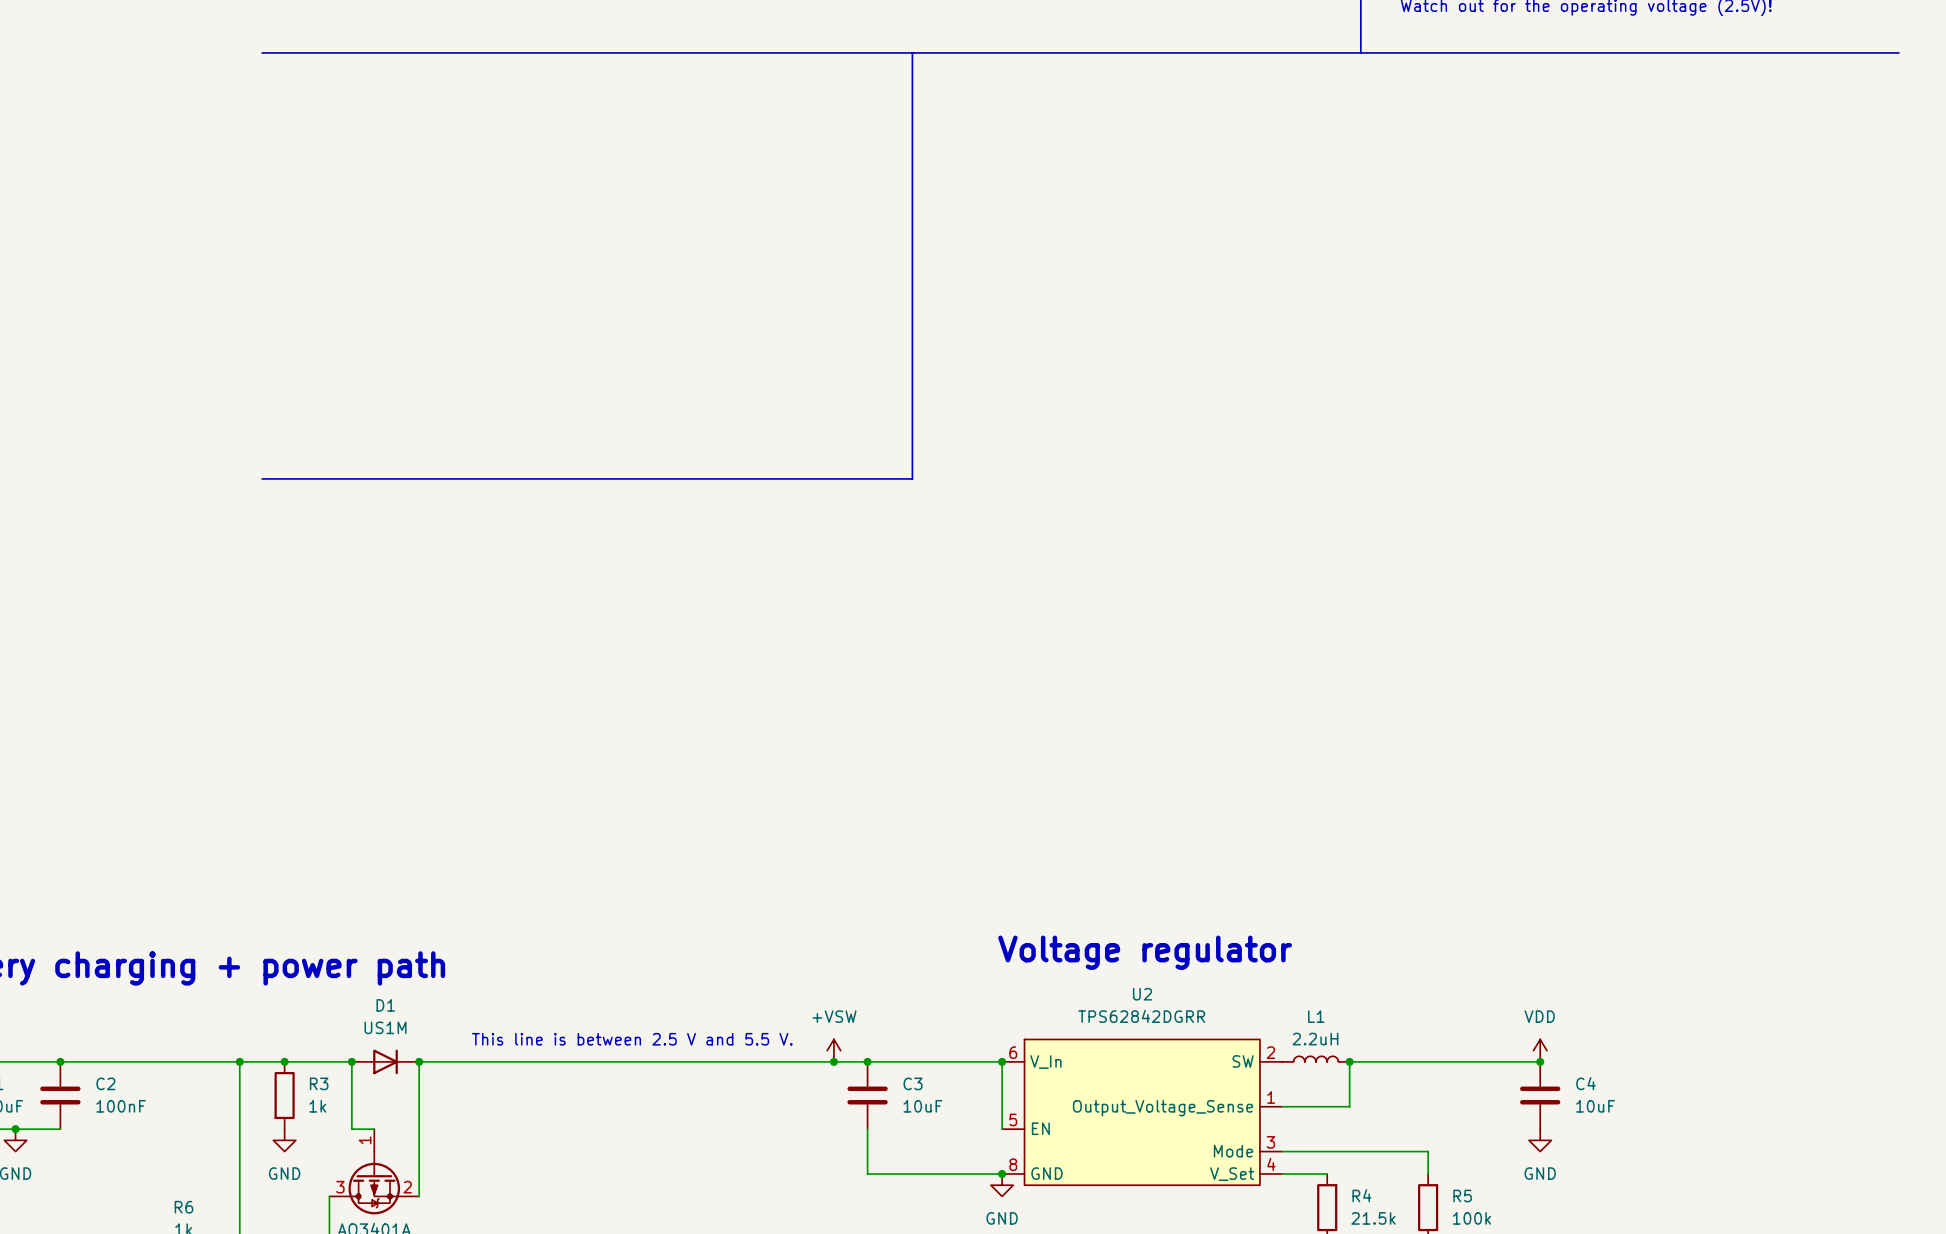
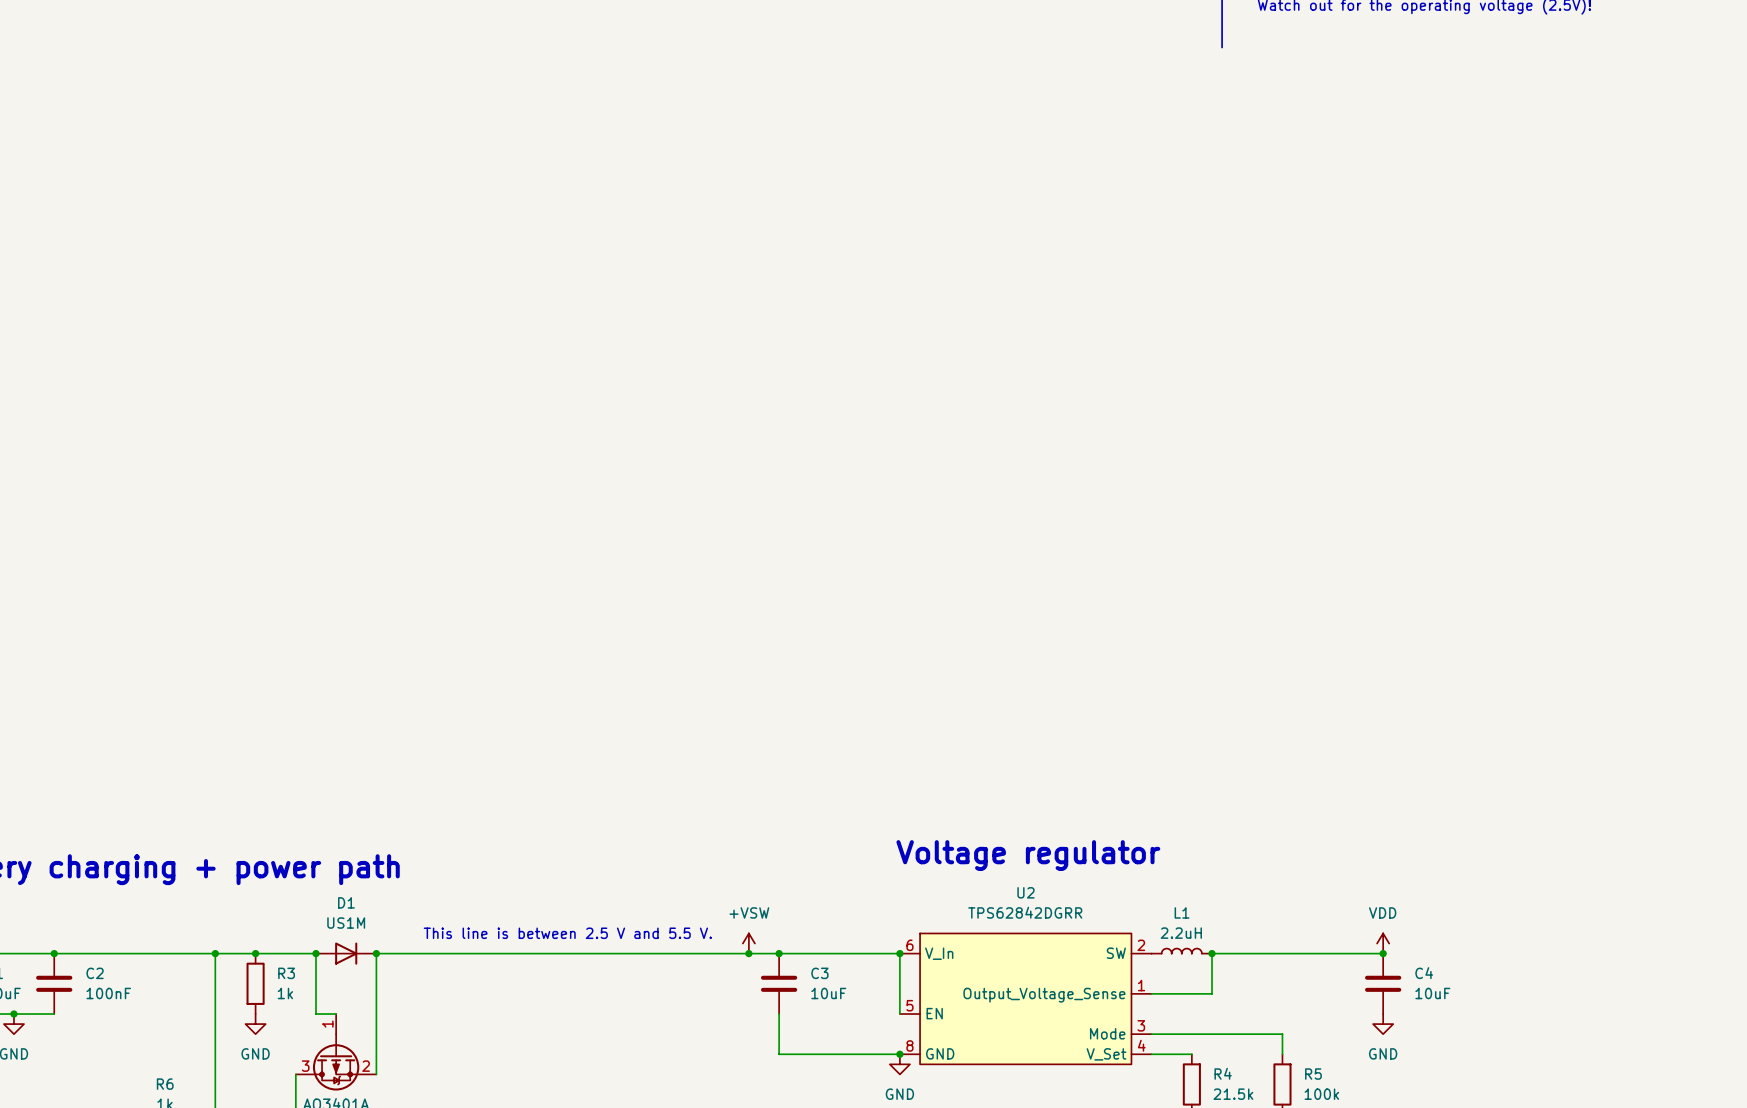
line: (262, 52) (1898, 52) -> none
line: (912, 52) (912, 478) (262, 478) -> none

